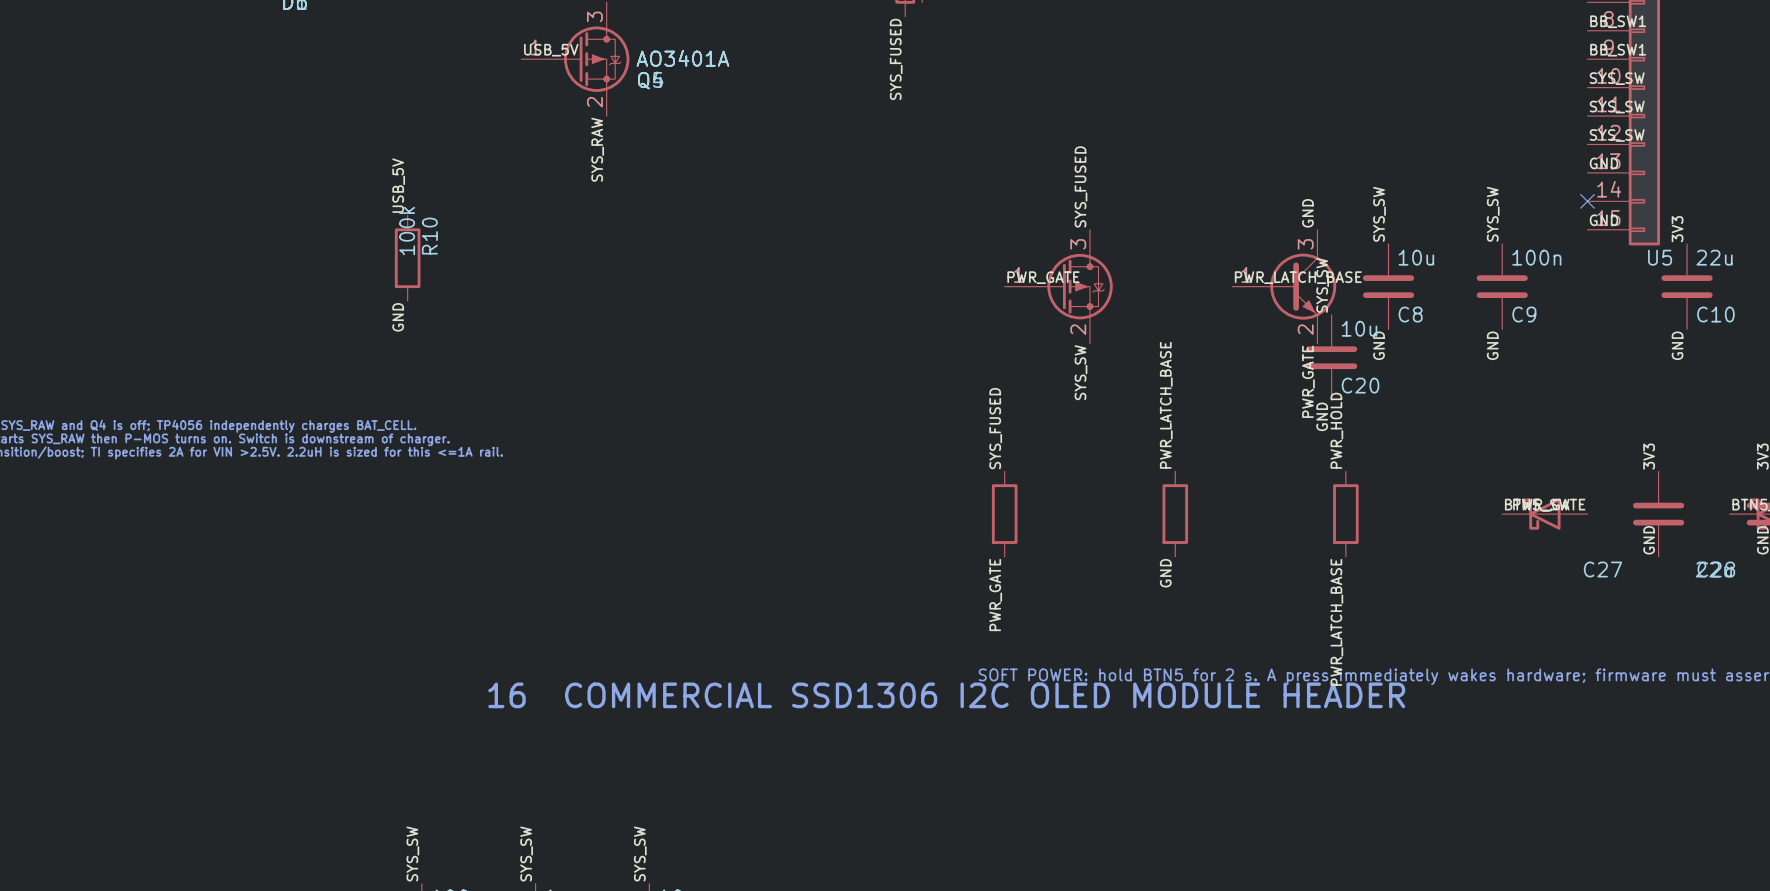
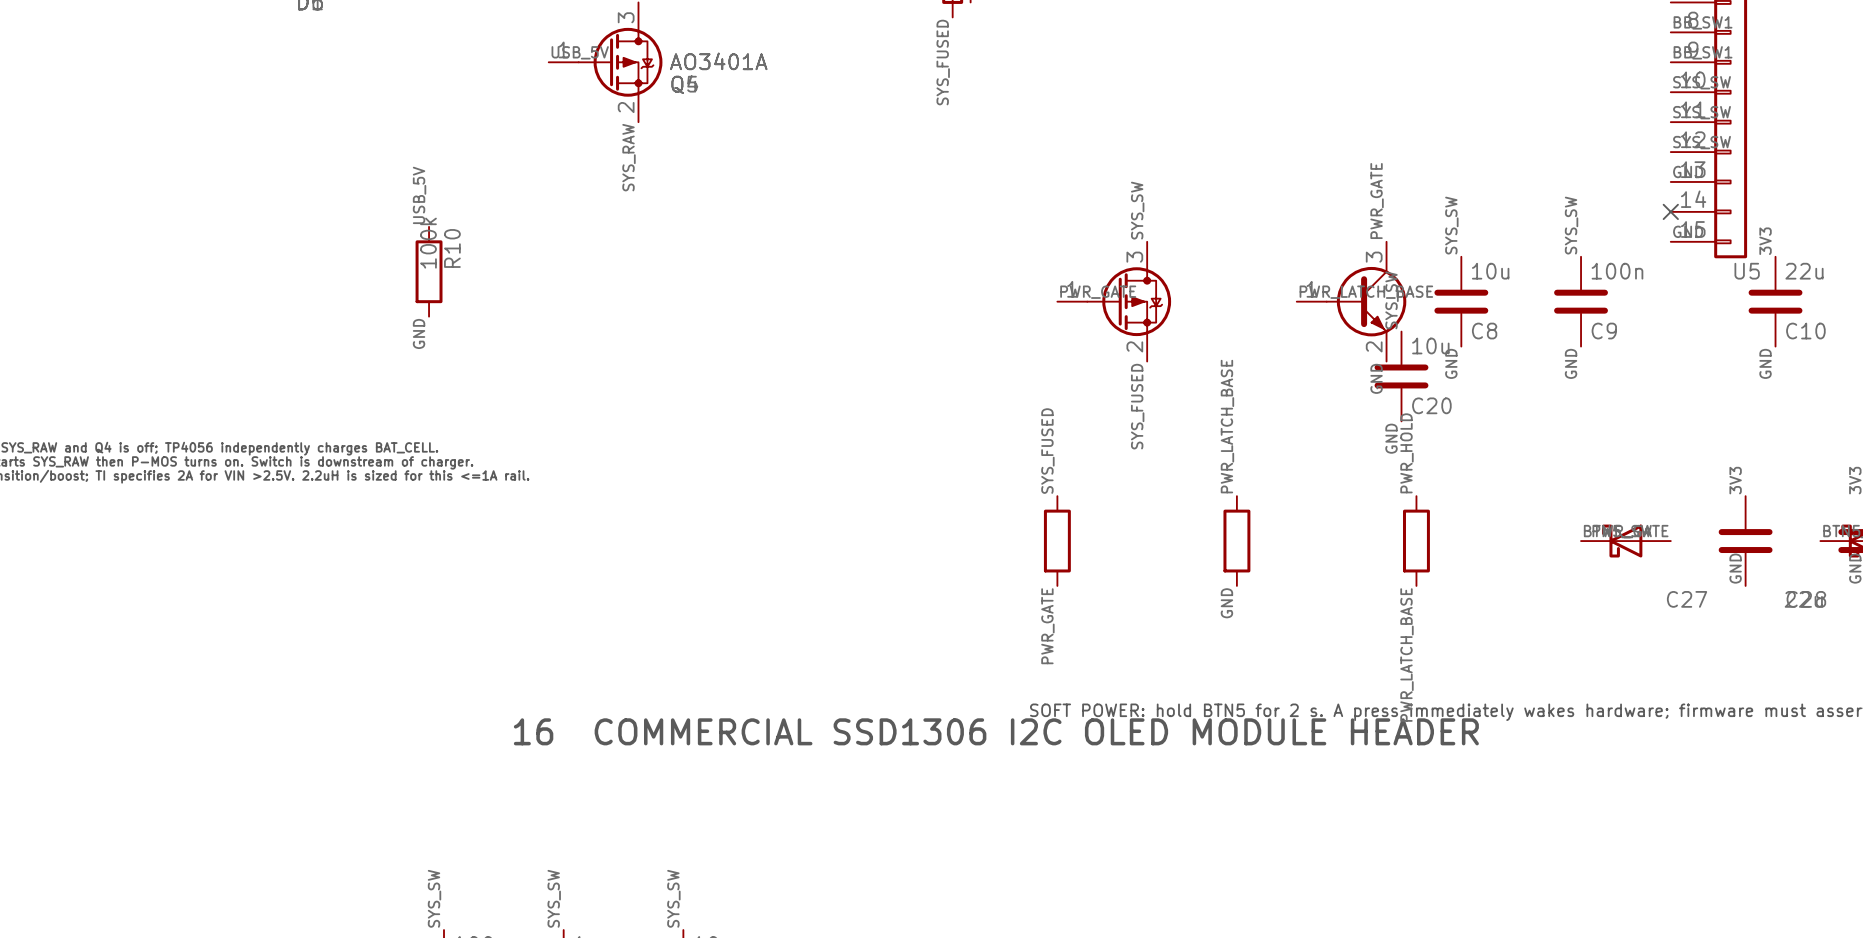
label: SYS_FUSED (1080, 186) -> SYS_SW (1137, 210)
label: GND (1307, 213) -> PWR_GATE (1377, 201)
label: SYS_SW (1080, 372) -> SYS_FUSED (1137, 406)
label: PWR_GATE (1308, 381) -> GND (1376, 378)

